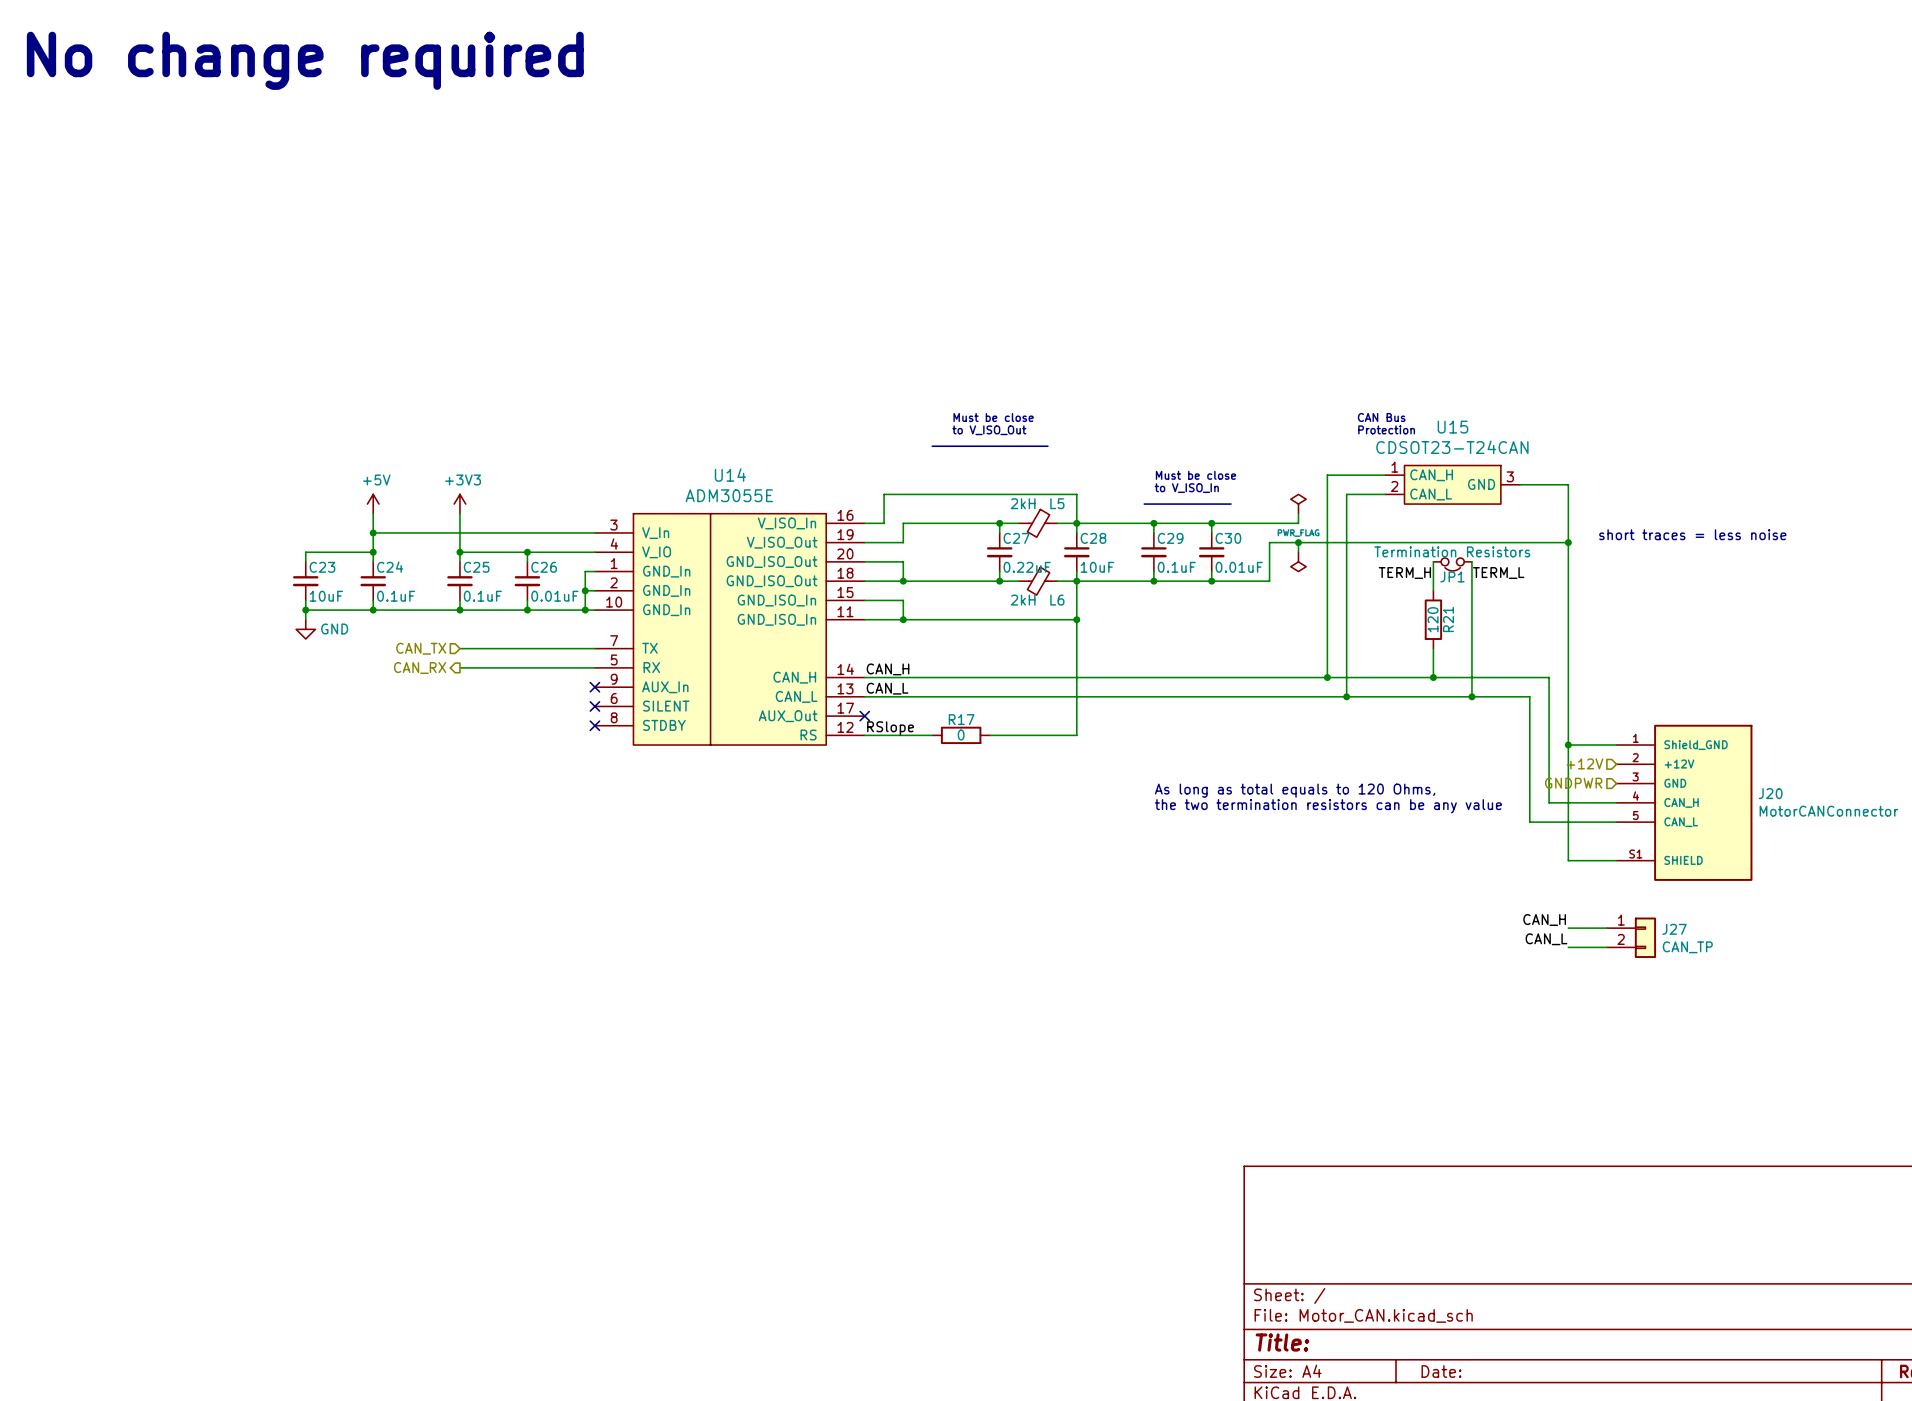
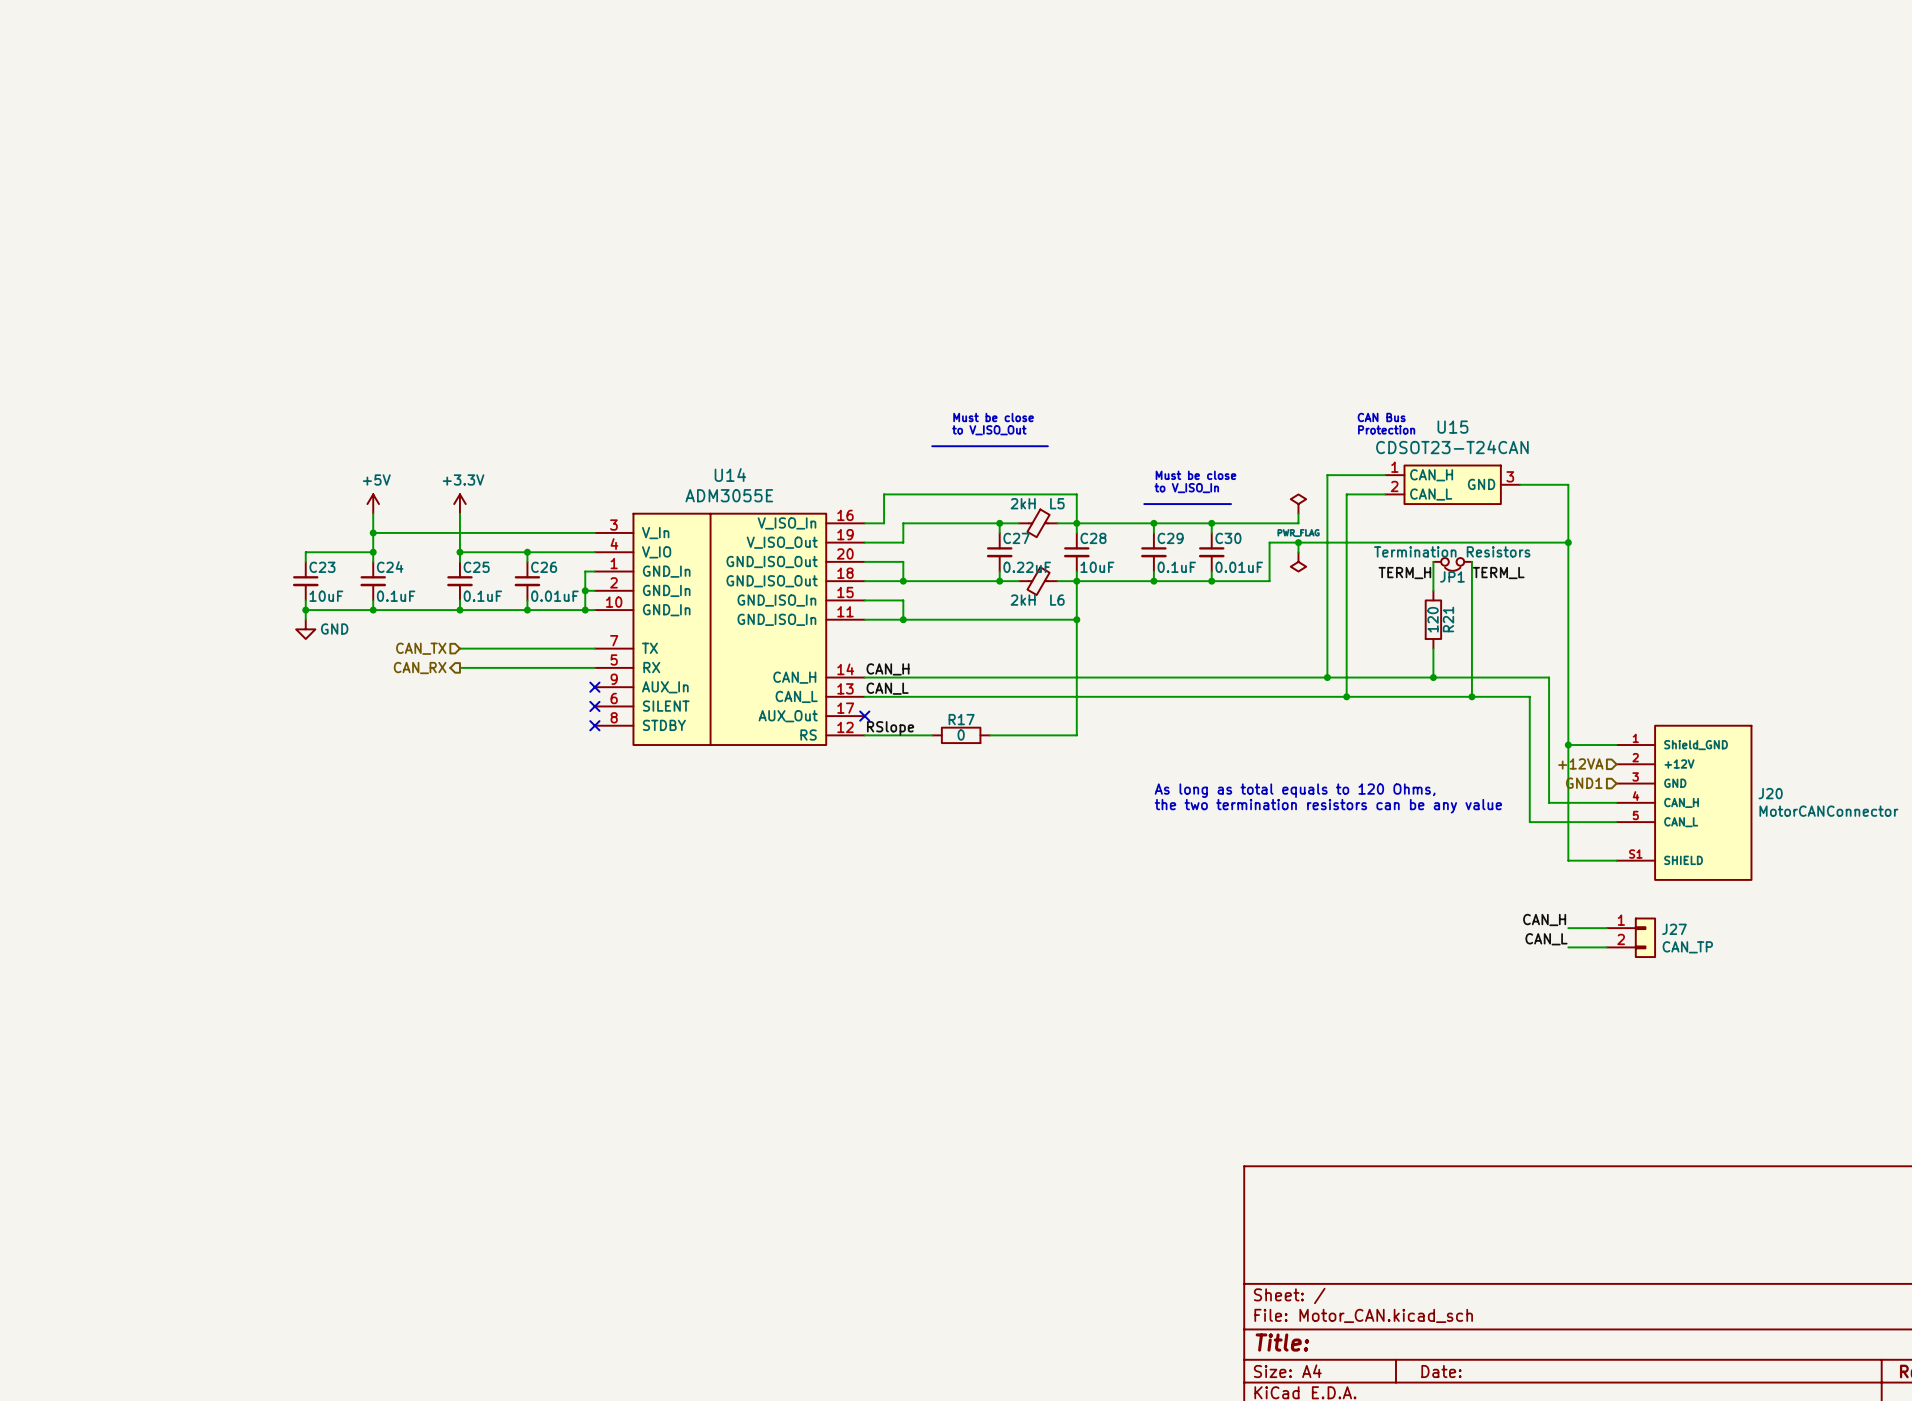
text: No change required (305, 60) -> none
power symbol: +3V3 (459, 504) -> +3.3V (459, 504)
text: short traces = less noise (1692, 534) -> none
hierarchical label: +12V (1584, 763) -> +12VA (1580, 763)
hierarchical label: GNDPWR (1573, 783) -> GND1 (1584, 783)

